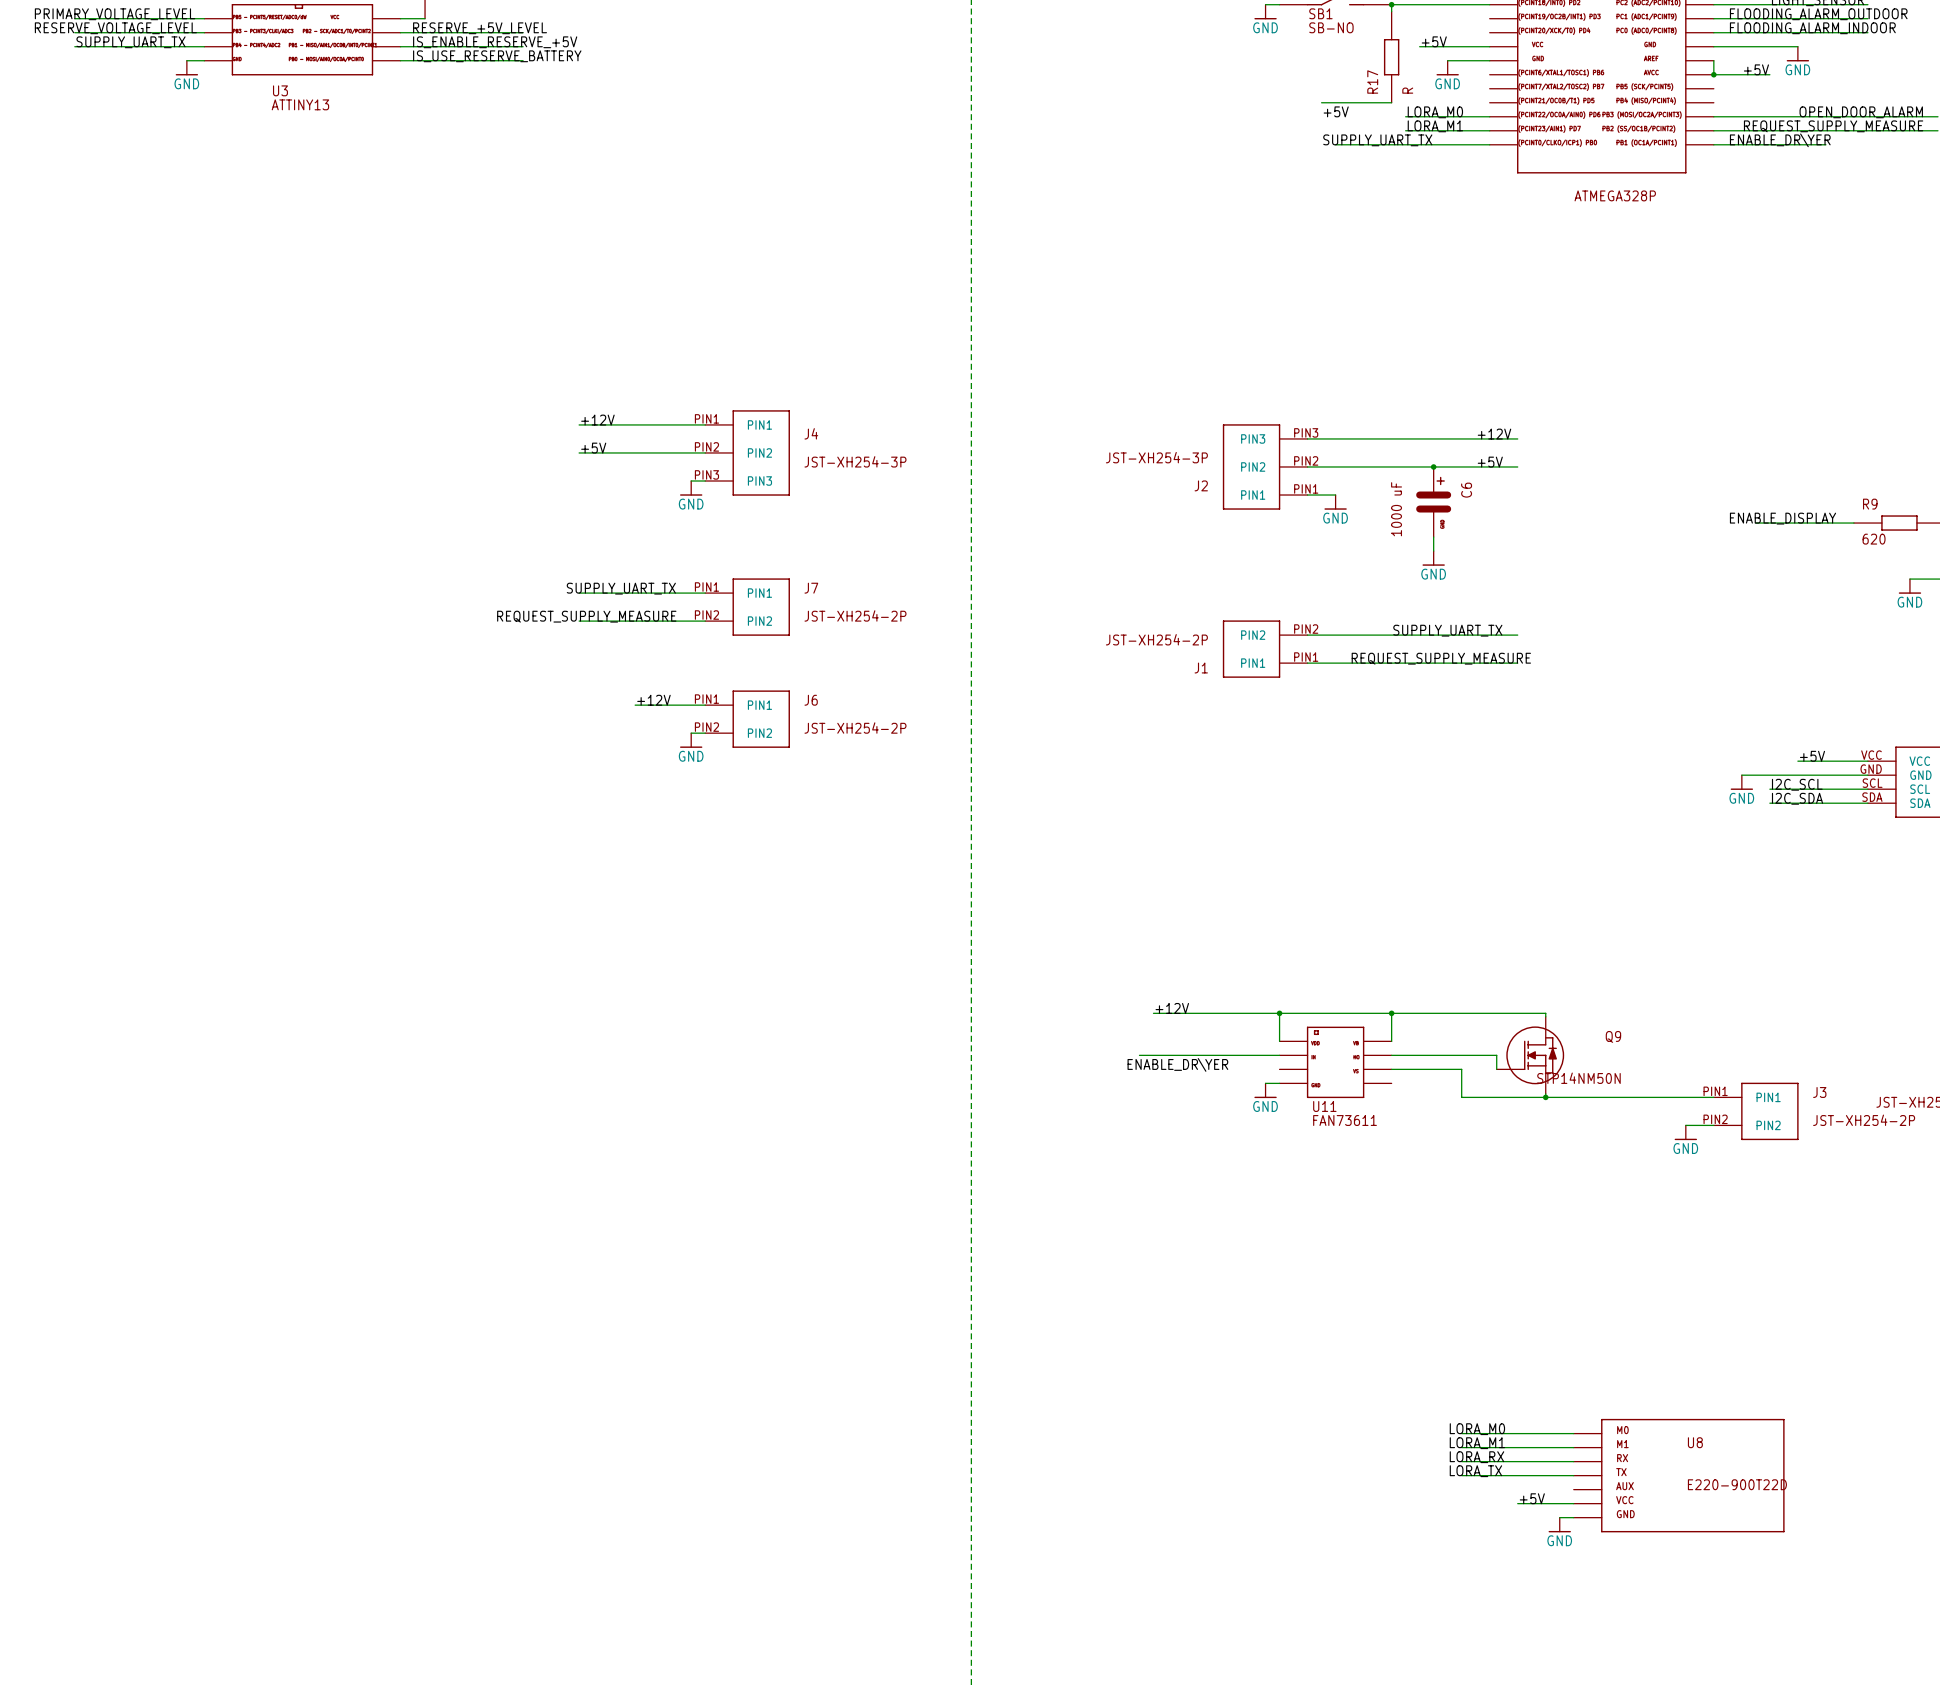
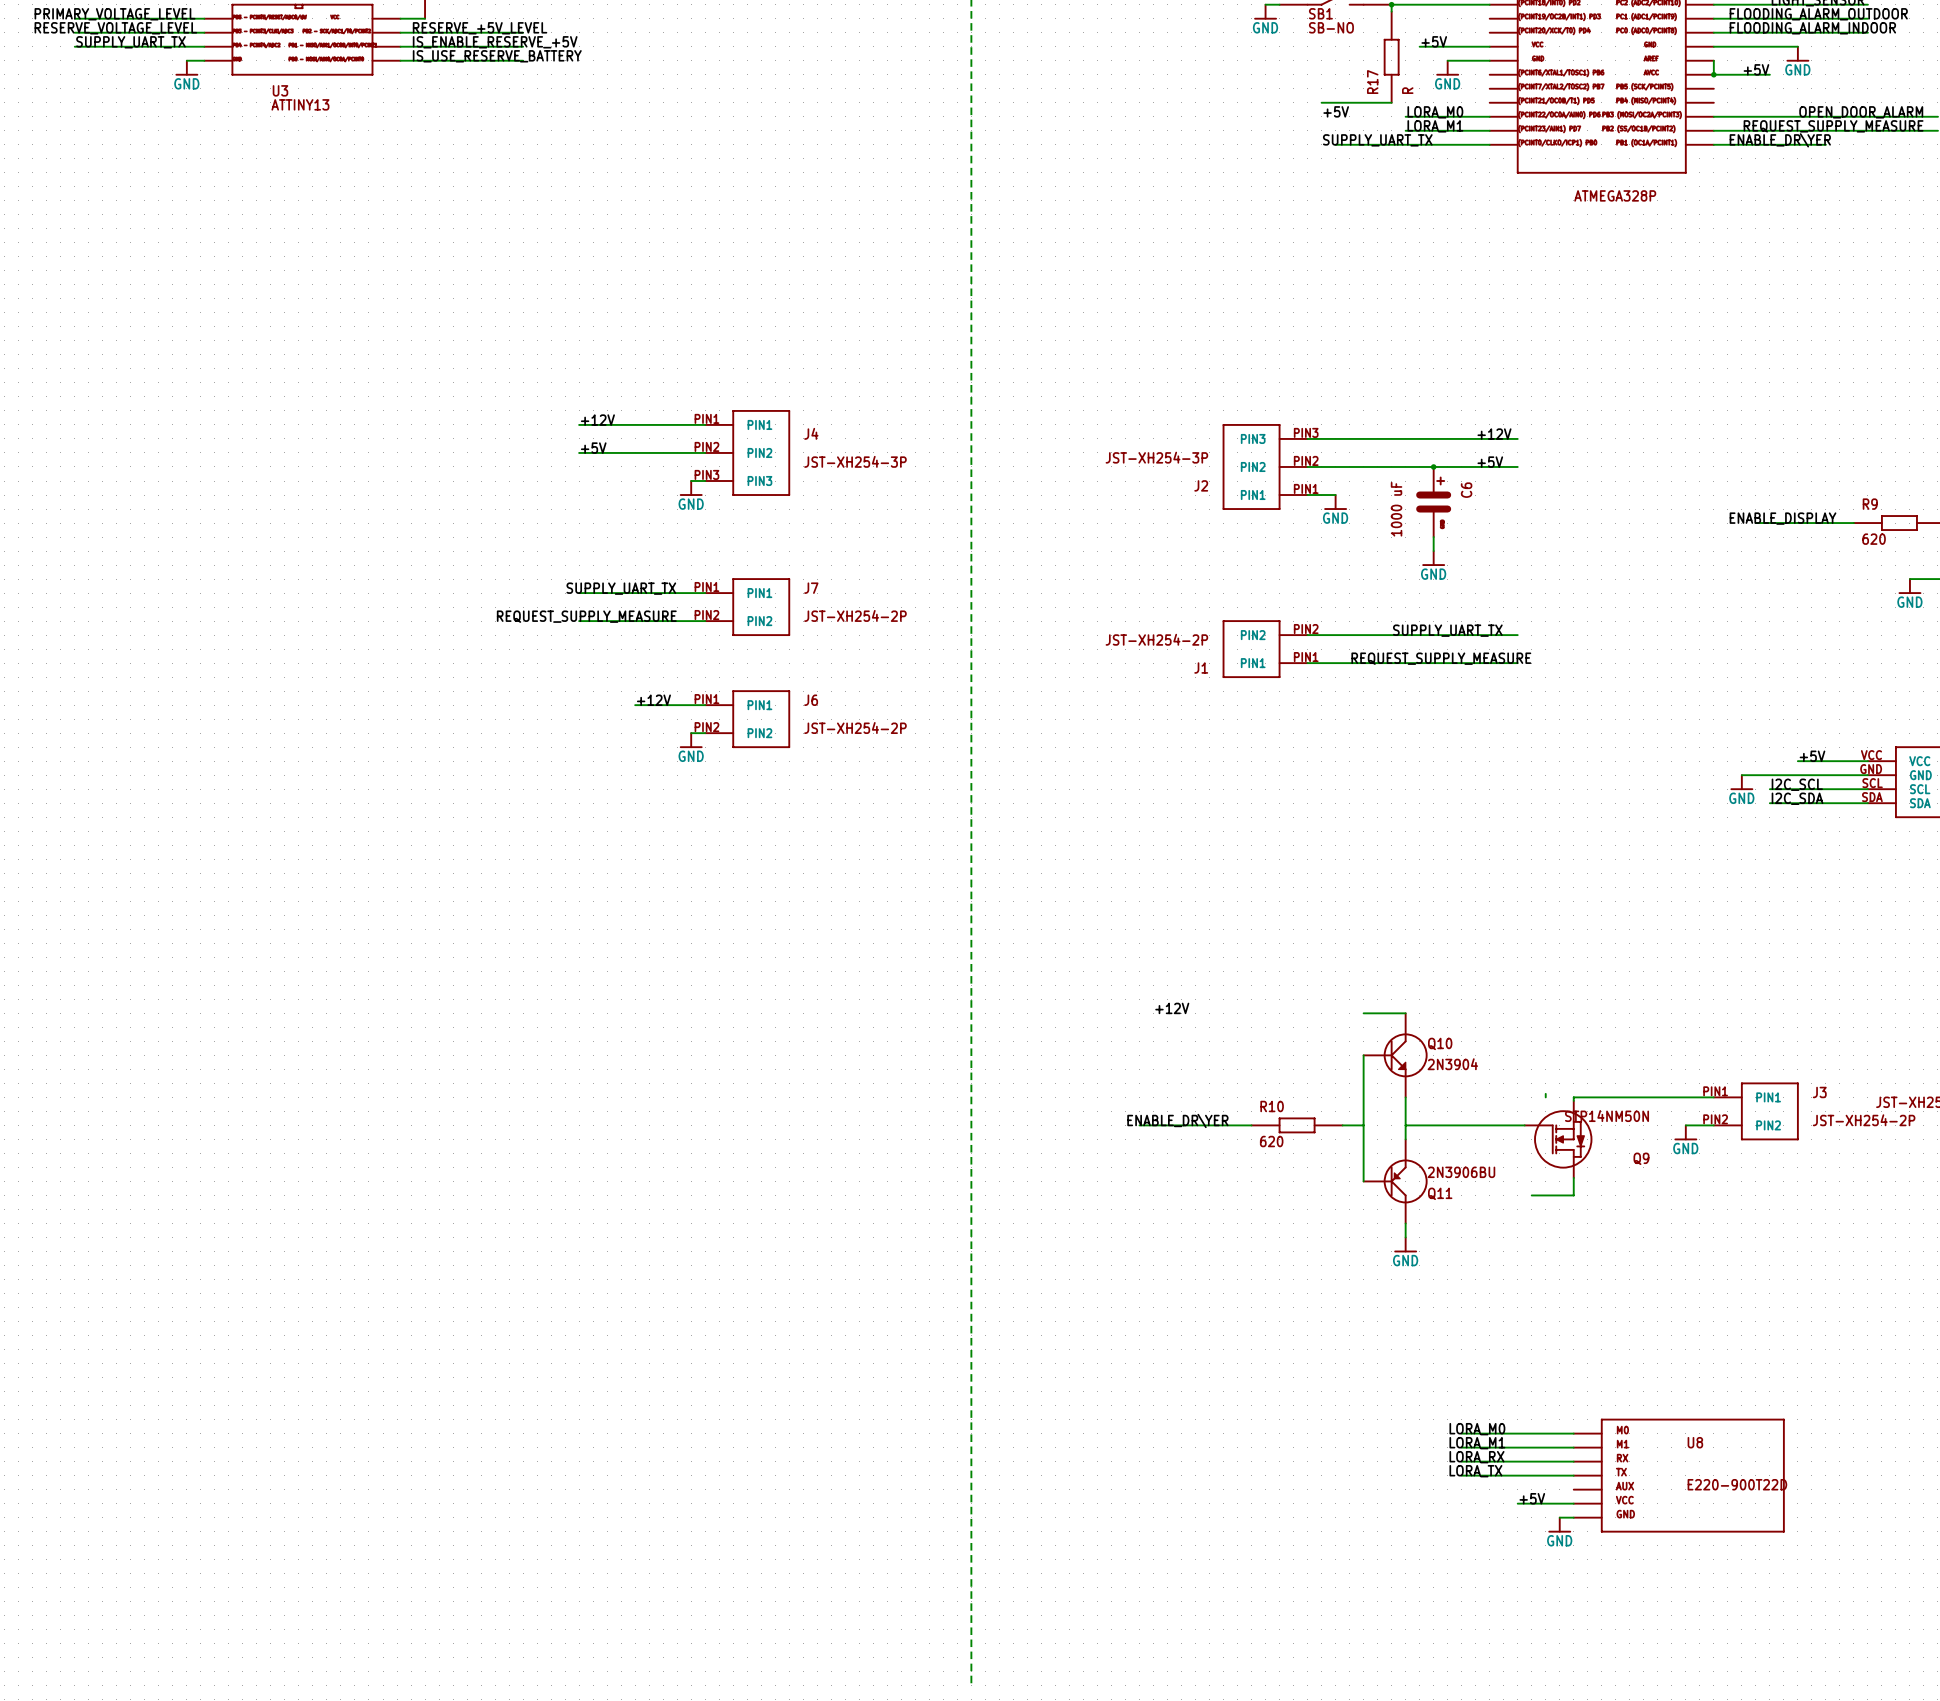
wire: (1153, 1013) (1363, 1013) -> none
wire: (1279, 1013) (1279, 1041) -> none
junction: (1279, 1013) -> none
wire: (1391, 1013) (1391, 1041) -> none
junction: (1391, 1013) -> none
wire: (1405, 1013) (1545, 1013) (1545, 1016) -> none
wire: (1139, 1055) (1279, 1055) -> none
wire: none -> (1363, 1055) (1363, 1181)
wire: (1391, 1055) (1496, 1055) (1496, 1069) -> none
Q10: none -> 2N3904 (1395, 1055)
Q9 position: (1530, 1055) -> (1558, 1139)
Q9 flip: as is (1535, 1055) -> up-down (1563, 1139)
U11: FAN73611 (1335, 1062) -> none
label position: ENABLE_DR\YER (1177, 1064) -> ENABLE_DR\YER (1177, 1120)
wire: (1391, 1069) (1461, 1069) (1461, 1097) (1573, 1097) -> (1573, 1100) (1573, 1097)
wire: (1265, 1083) (1279, 1083) -> none
power symbol: GND (1265, 1090) -> none
wire: none -> (1405, 1097) (1405, 1139)
junction: (1545, 1097) -> none
wire: none -> (1139, 1125) (1251, 1125)
R10: none -> 620 (1297, 1125)
wire: none -> (1405, 1125) (1524, 1125)
wire: none -> (1573, 1177) (1573, 1195) (1531, 1195)
Q11: none -> 2N3906BU (1395, 1181)
wire: none -> (1405, 1223) (1405, 1237)
power symbol: none -> GND (1405, 1244)

